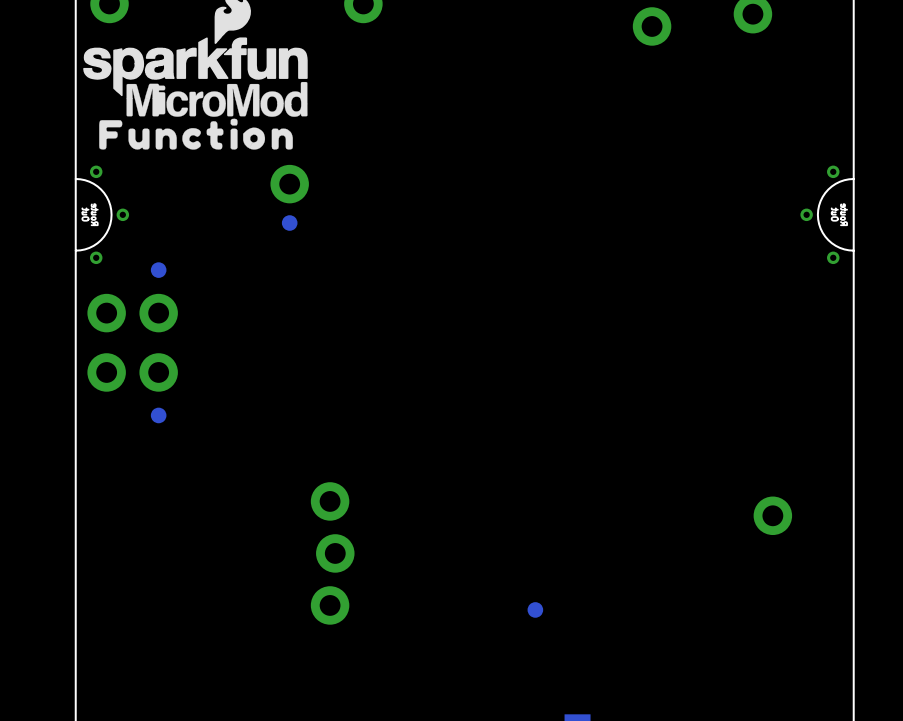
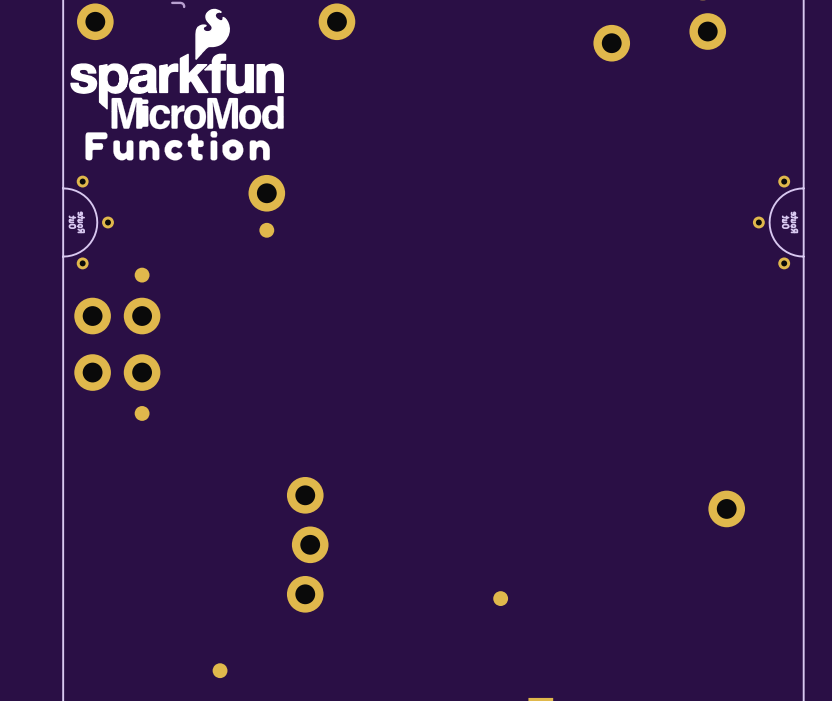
part: none -> (220, 670)

